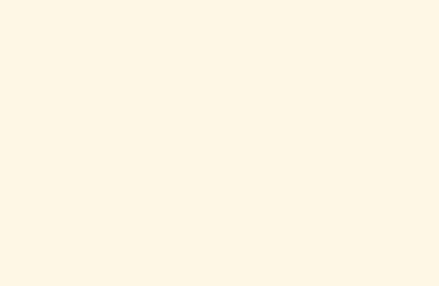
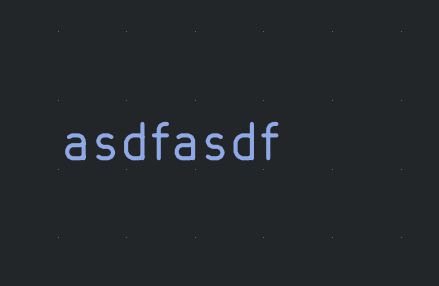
text: none -> asdfasdf (171, 141)

